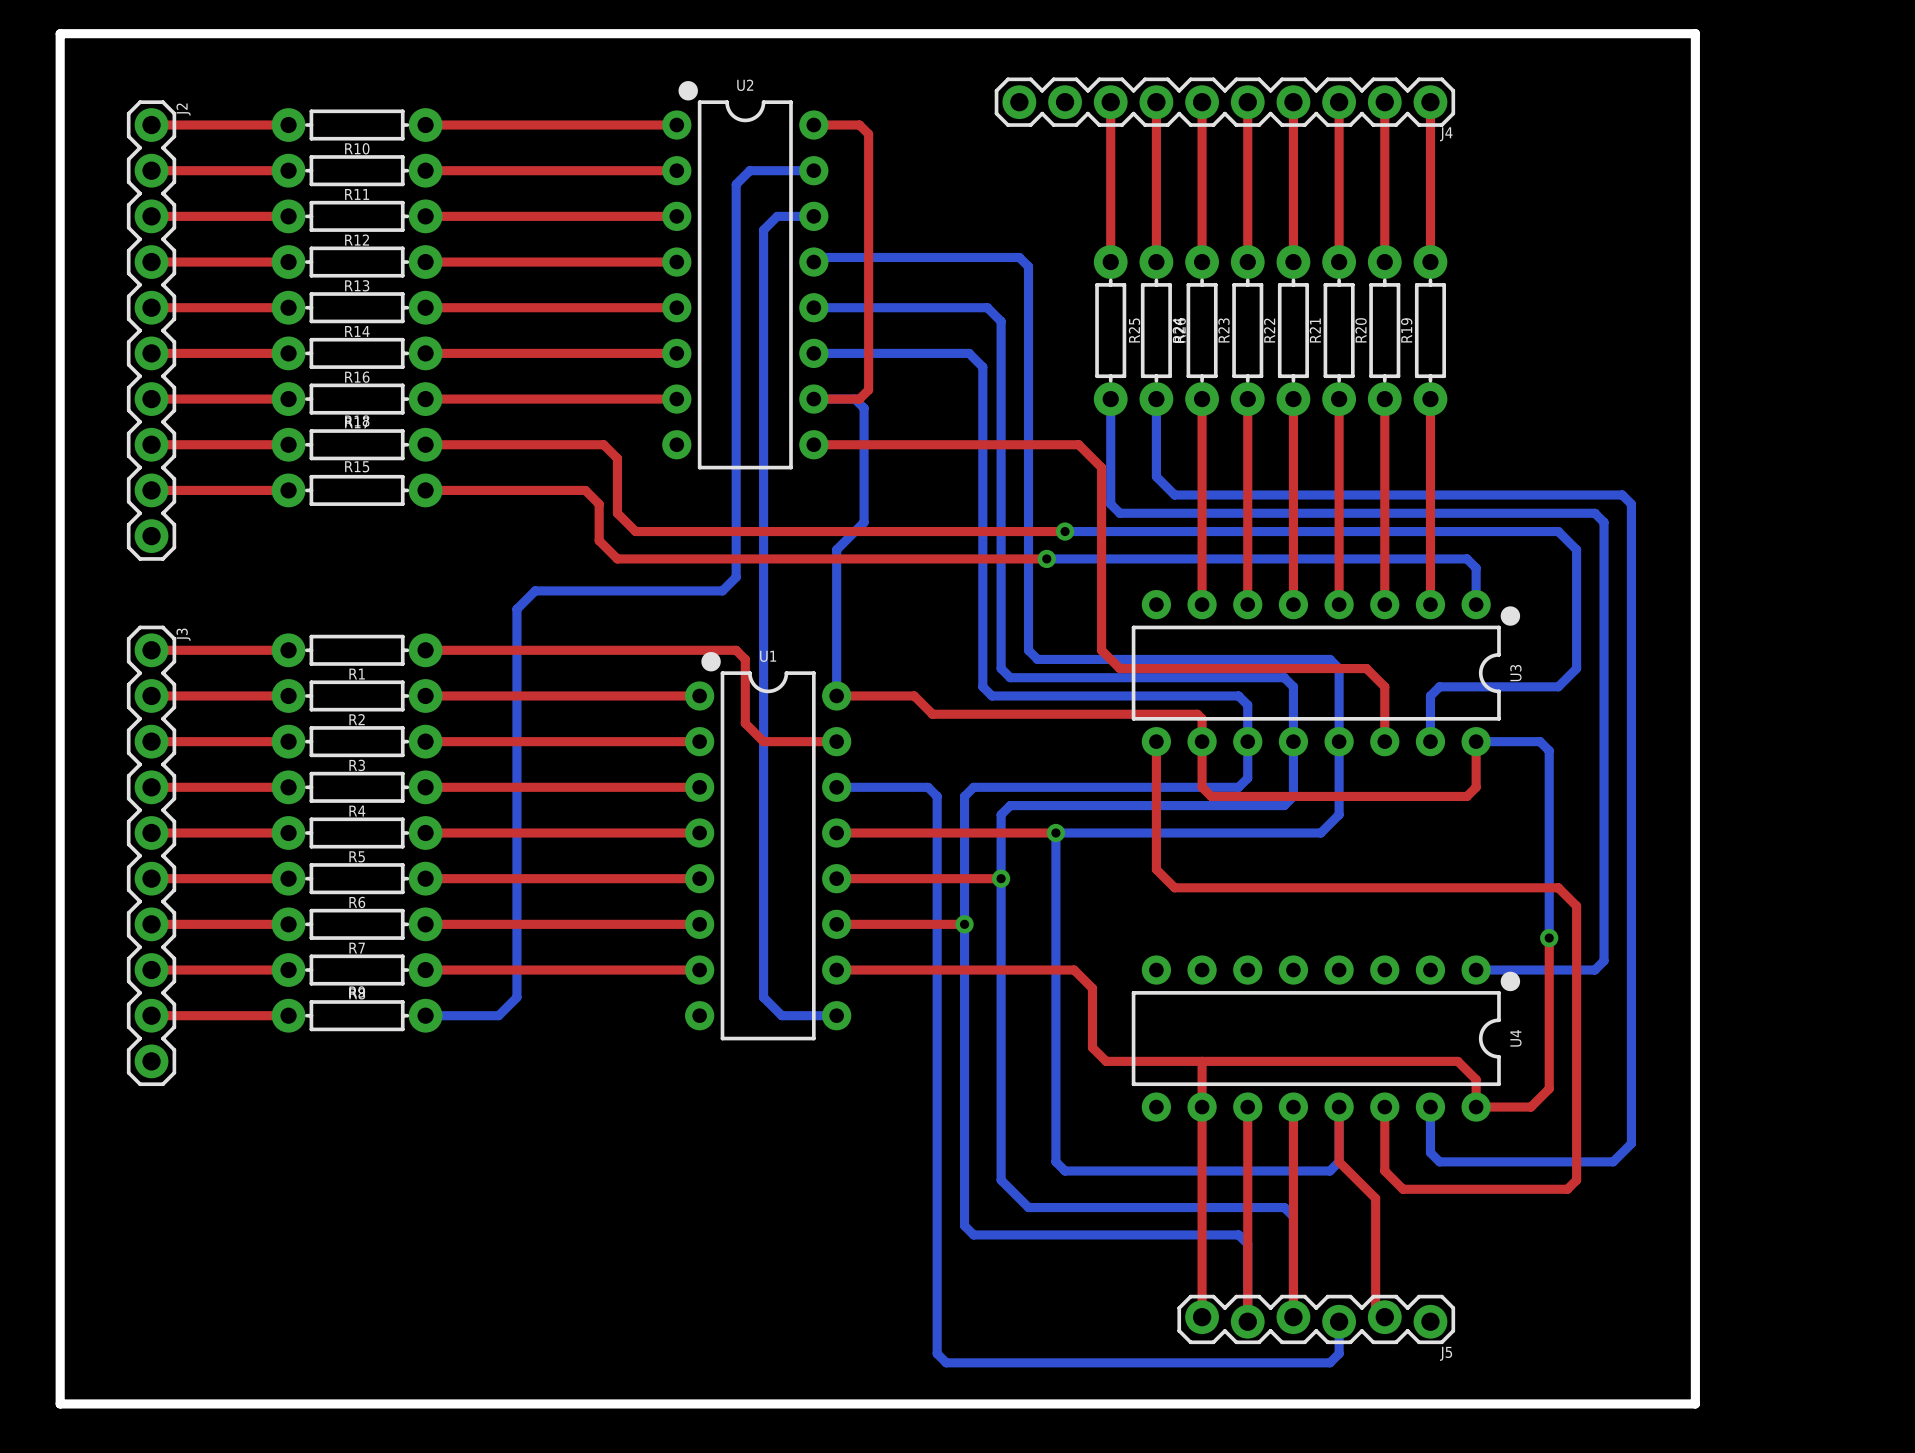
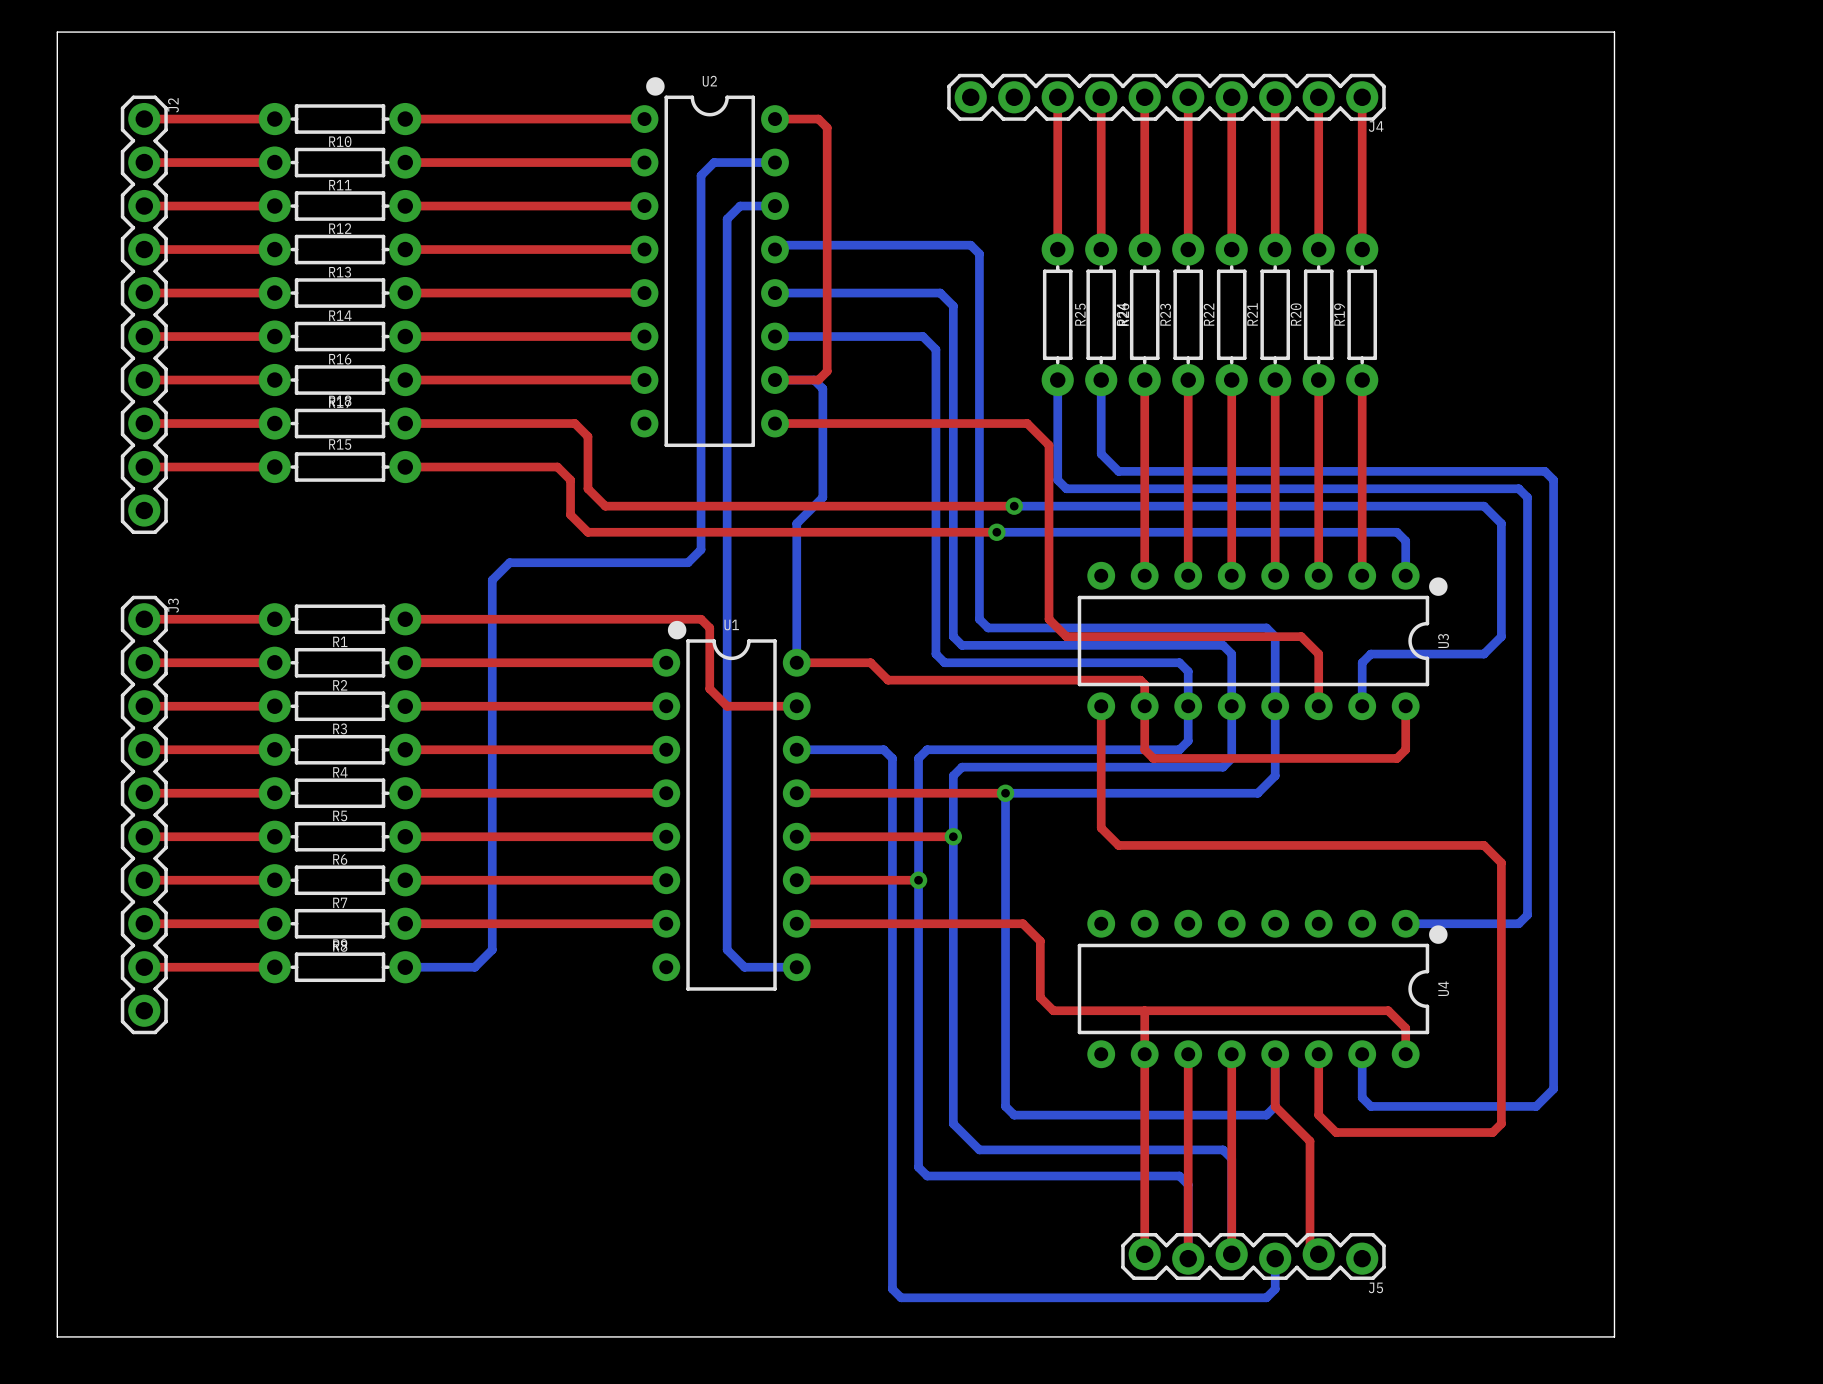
board edge width: thick (60, 33) (1695, 33) (1695, 1403) (60, 1403) (60, 33) -> thin (57, 32) (1614, 32) (1614, 1336) (57, 1336) (57, 32)
bottom track: (1476, 741) (1540, 741) (1549, 750) (1549, 938) -> none
top track: (1549, 938) (1549, 1088) (1530, 1107) (1476, 1107) -> none
via: (1549, 938) -> none

